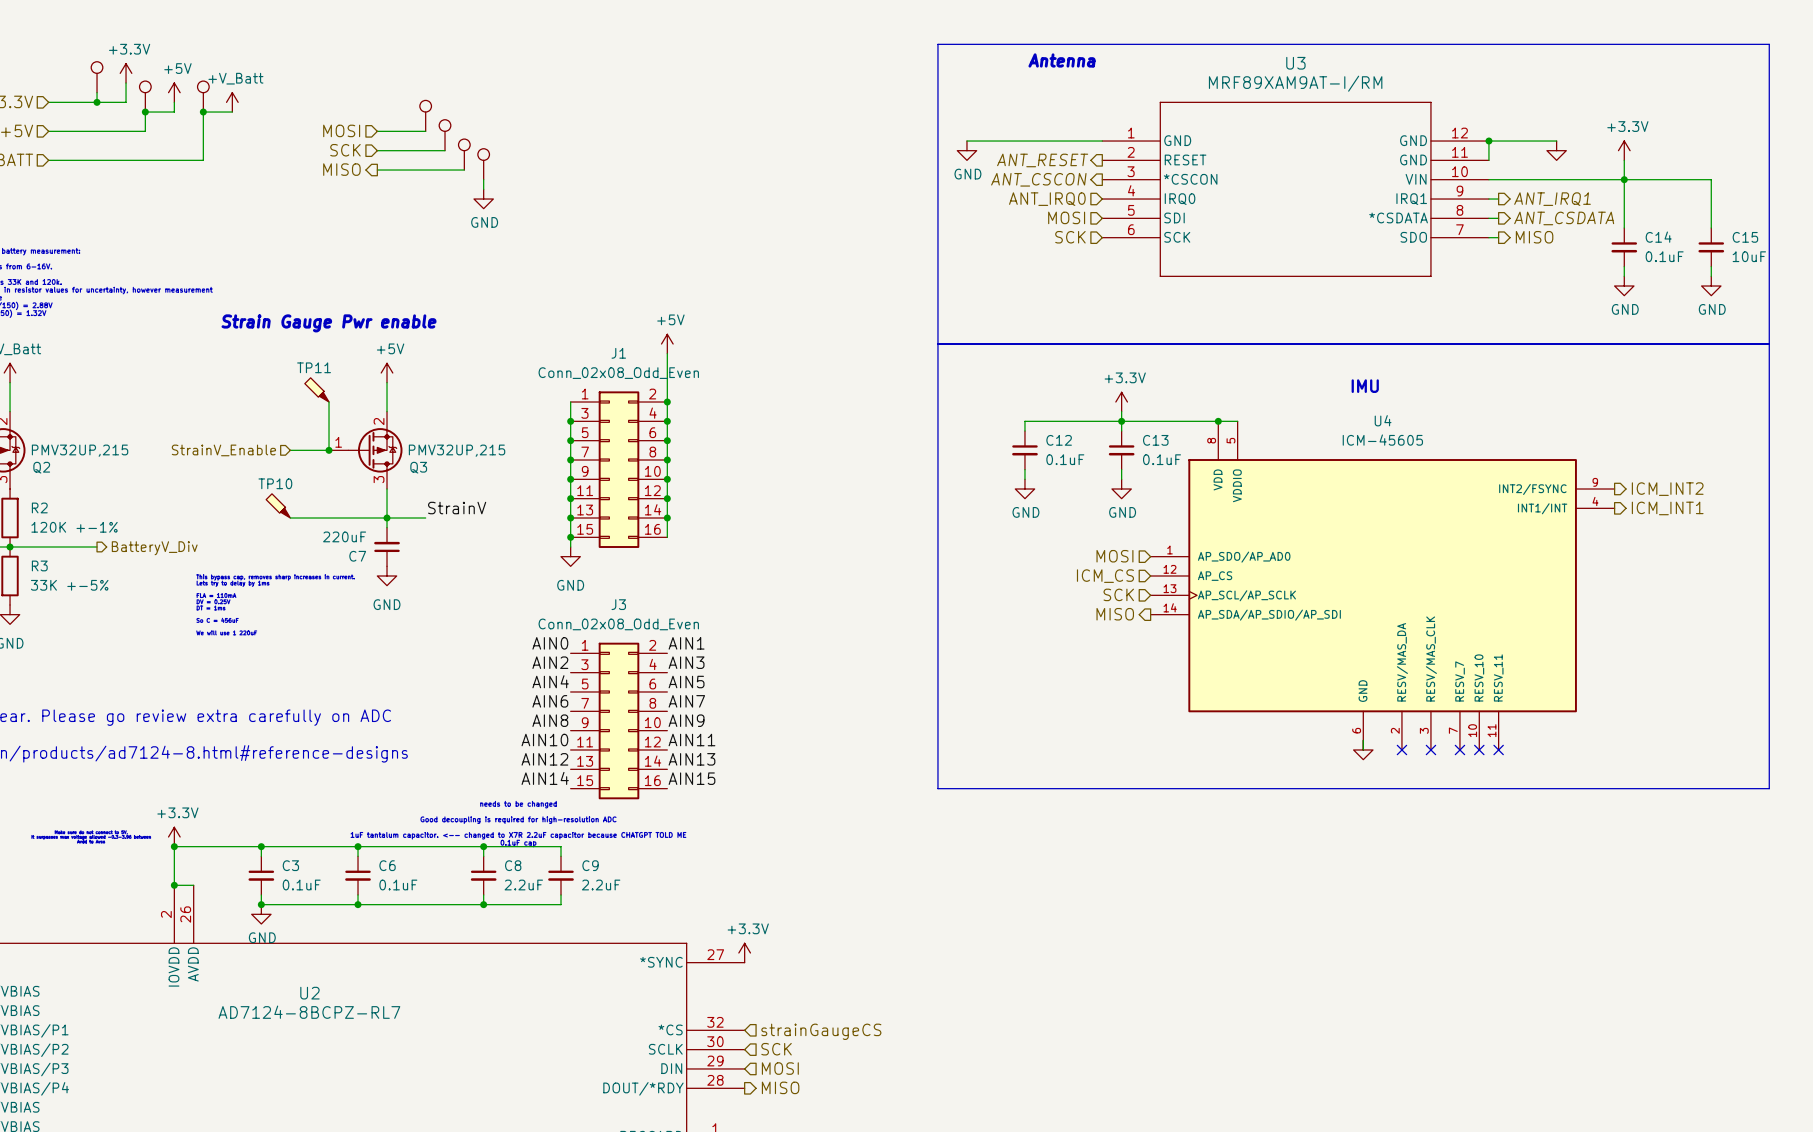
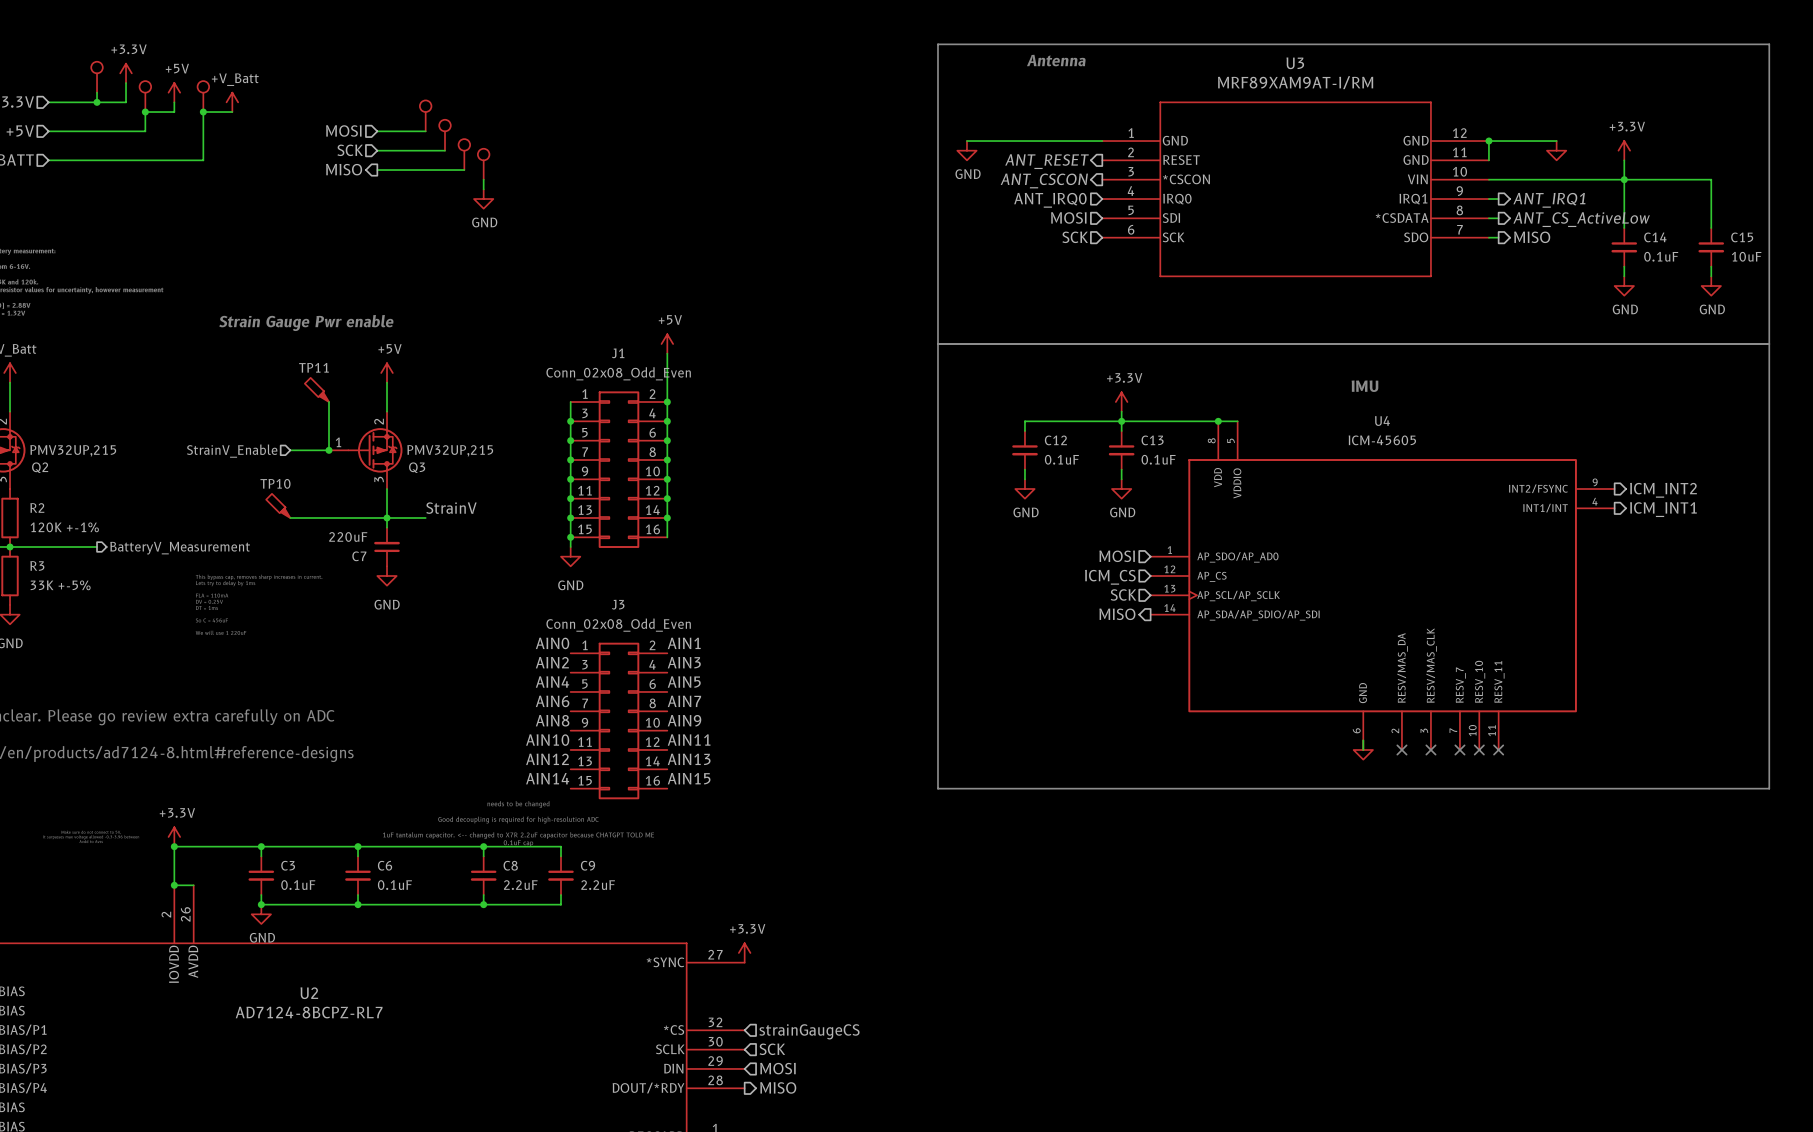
hierarchical label: ANT_CSDATA (1564, 218) -> ANT_CS_ActiveLow (1581, 219)
hierarchical label: BatteryV_Div (154, 548) -> BatteryV_Measurement (180, 548)

